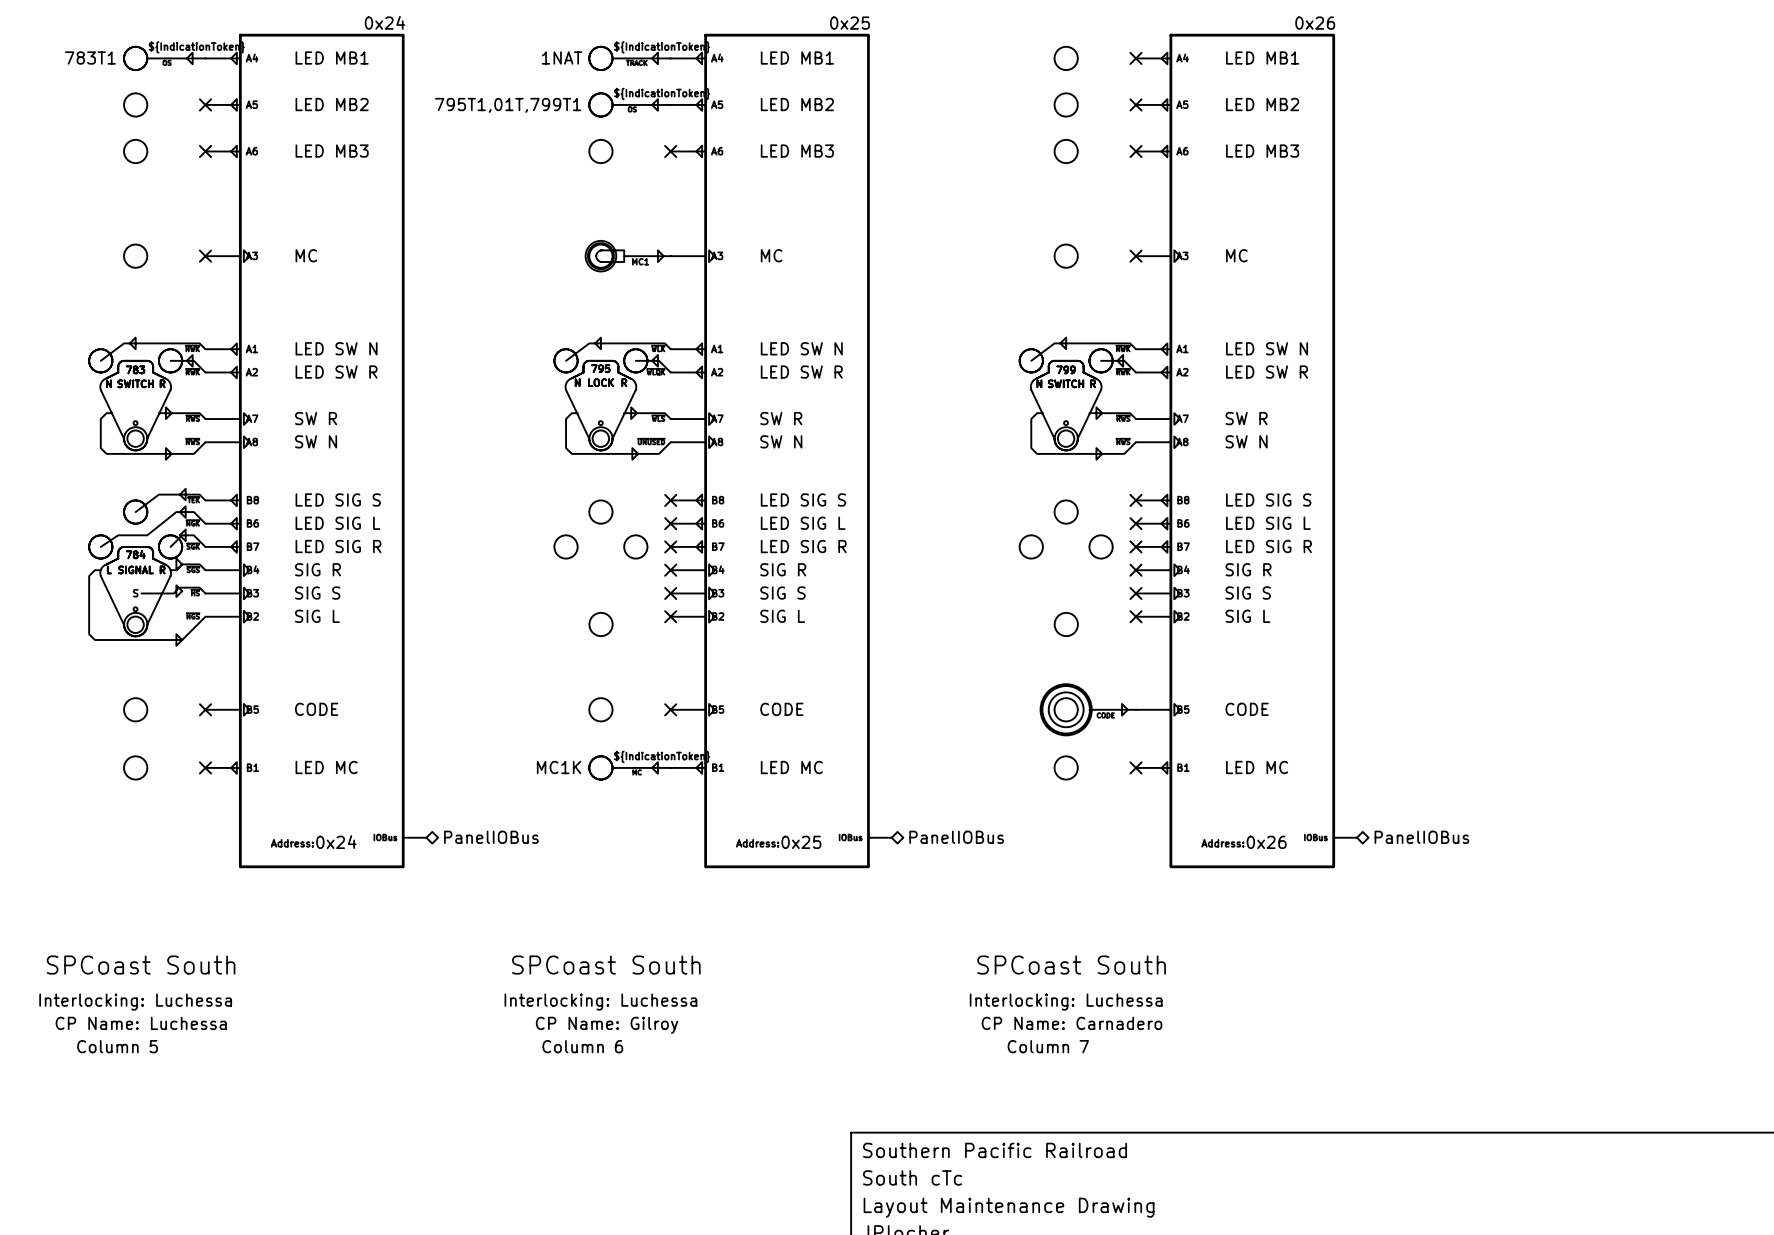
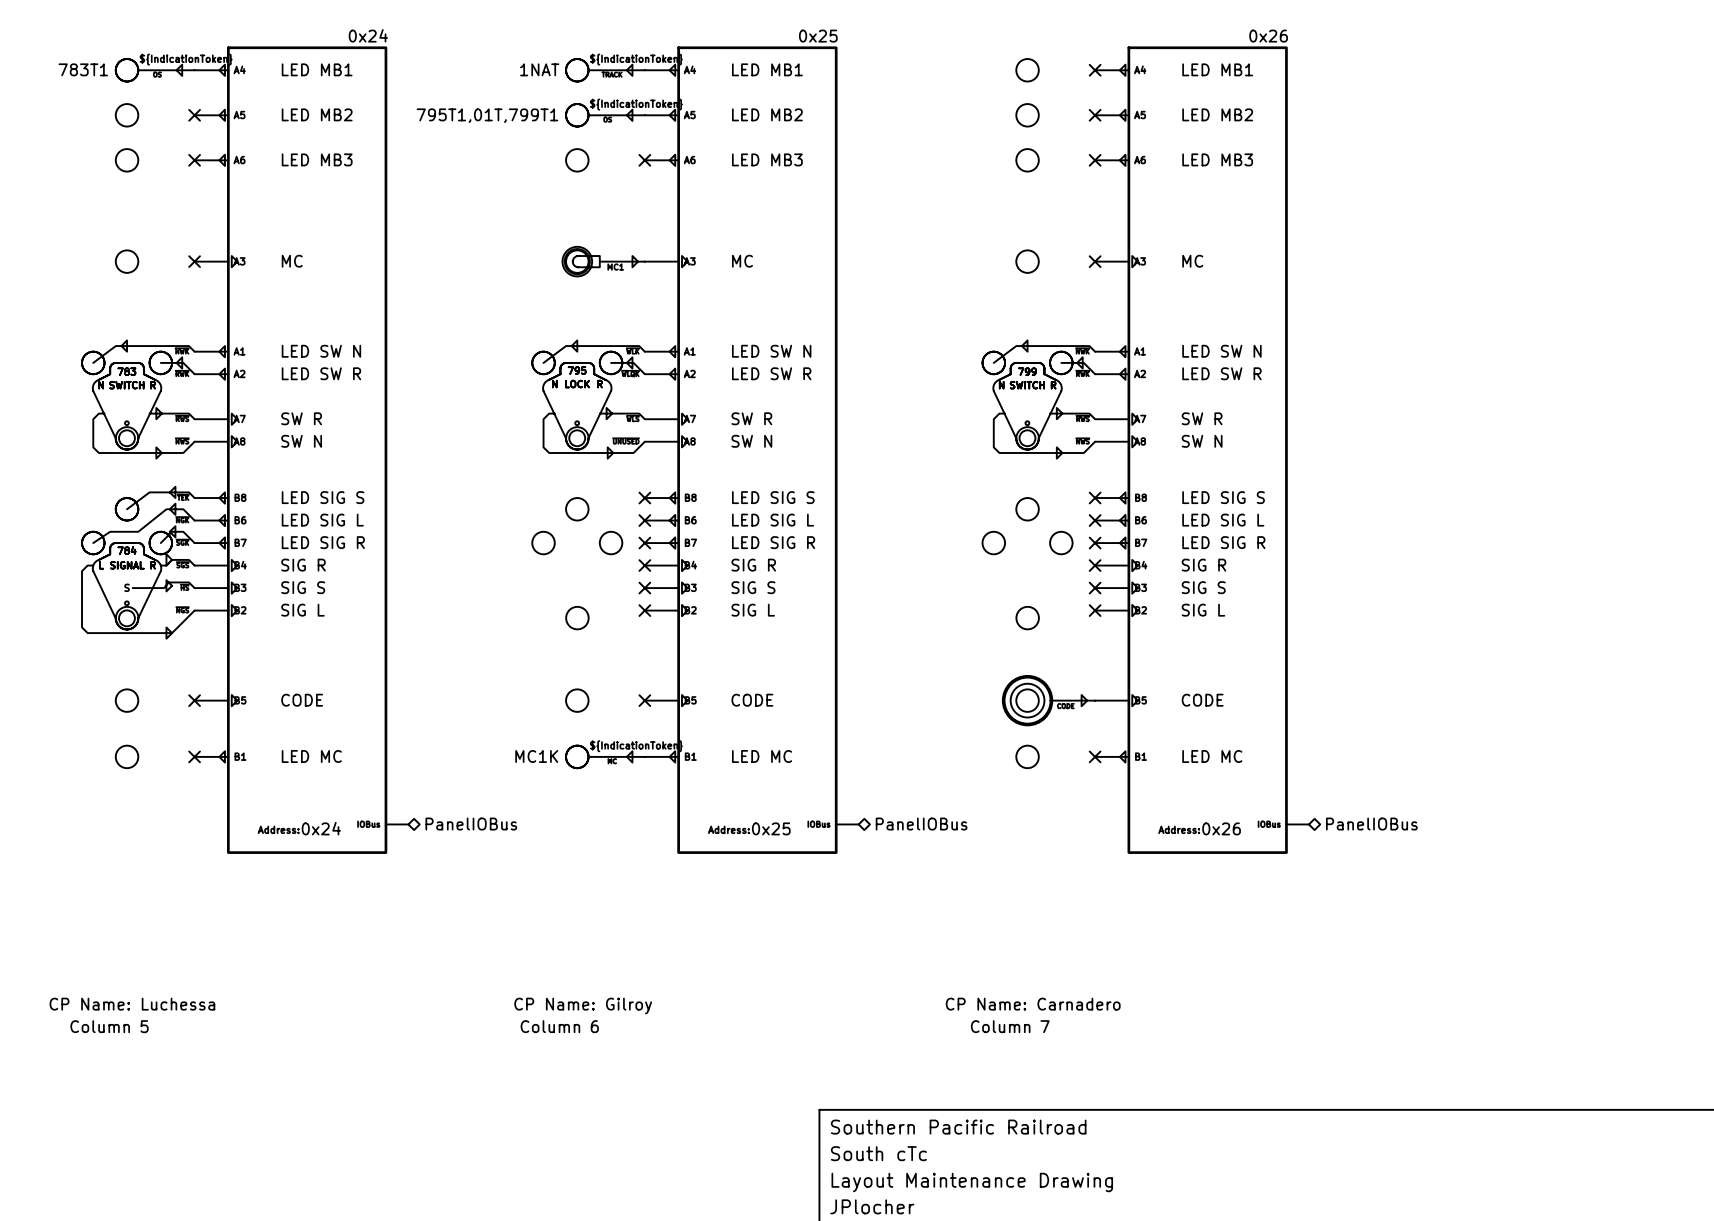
part text: SPCoast South (141, 965) -> none
part text: SPCoast South (606, 965) -> none
part text: SPCoast South (1071, 965) -> none
part text: Interlocking: Luchessa (135, 1002) -> none
part text: Interlocking: Luchessa (600, 1002) -> none
part text: Interlocking: Luchessa (1066, 1002) -> none

